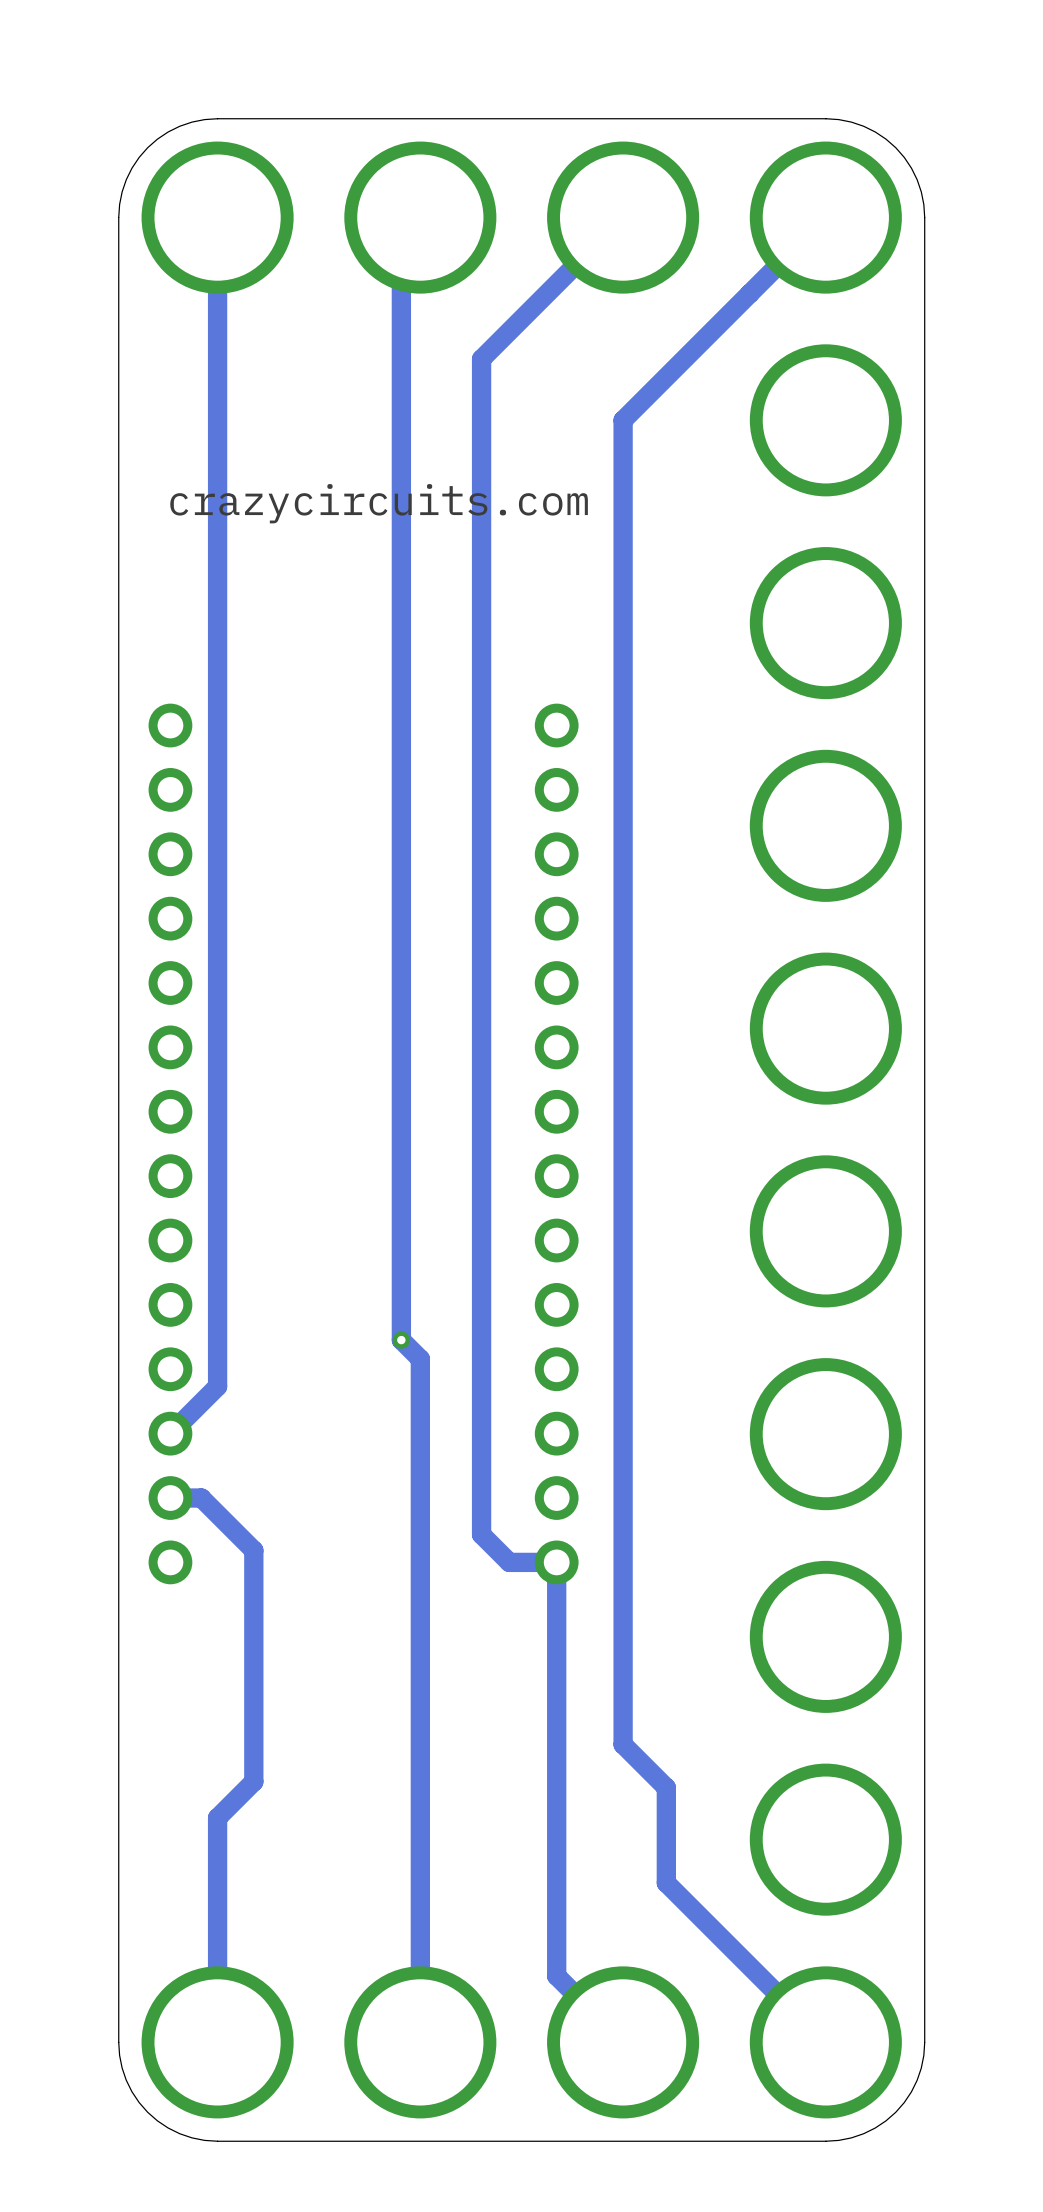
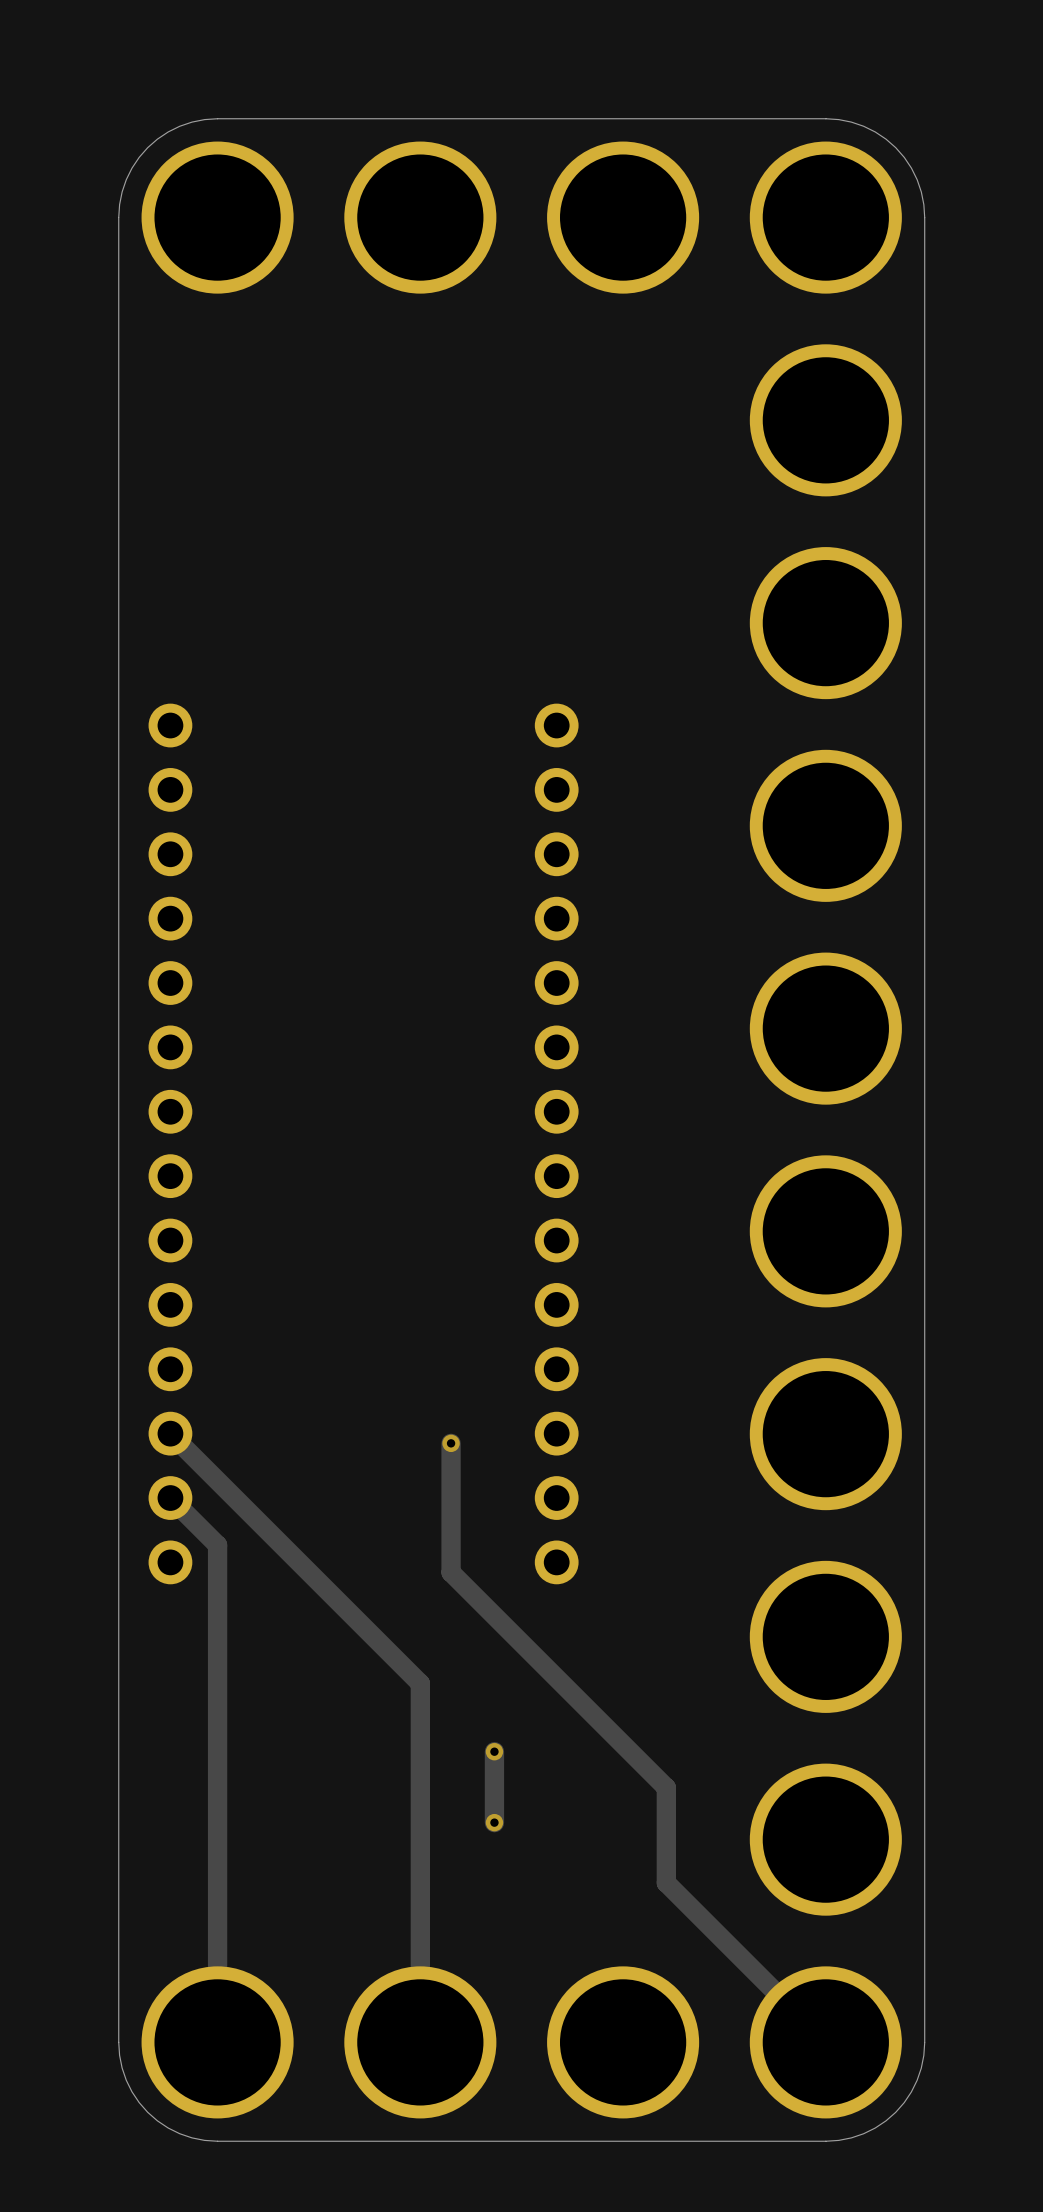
track: (217, 217) (217, 1386) (170, 1433) -> none
track: (420, 217) (401, 236) (401, 1340) (420, 1359) (420, 1683) -> (170, 1433) (420, 1683)
track: (623, 217) (481, 359) (481, 1534) (509, 1562) (556, 1562) (556, 1976) (623, 2042) -> none
track: (825, 217) (623, 420) (623, 1744) -> (451, 1443) (451, 1572) (623, 1744)
part: (379, 503) -> none
via position: (401, 1340) -> (451, 1443)
track: (170, 1498) (201, 1498) (253, 1550) (253, 1781) (217, 1817) -> (170, 1498) (217, 1545) (217, 1817)
track: none -> (494, 1751) (494, 1822)
via: none -> (494, 1751)
via: none -> (494, 1822)

